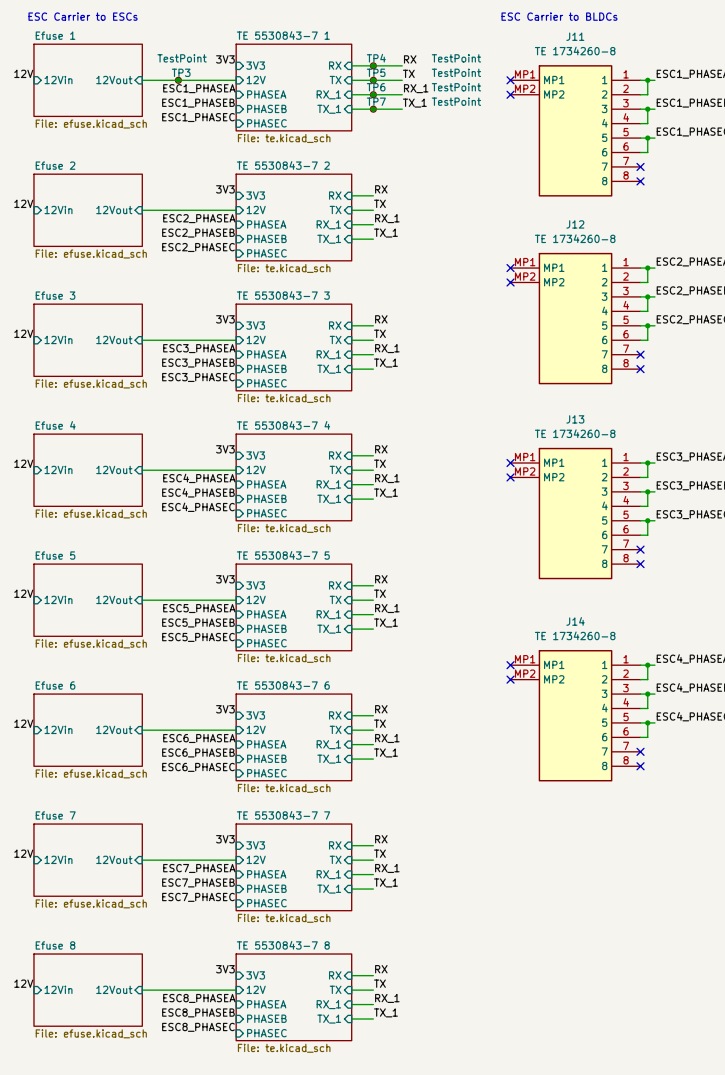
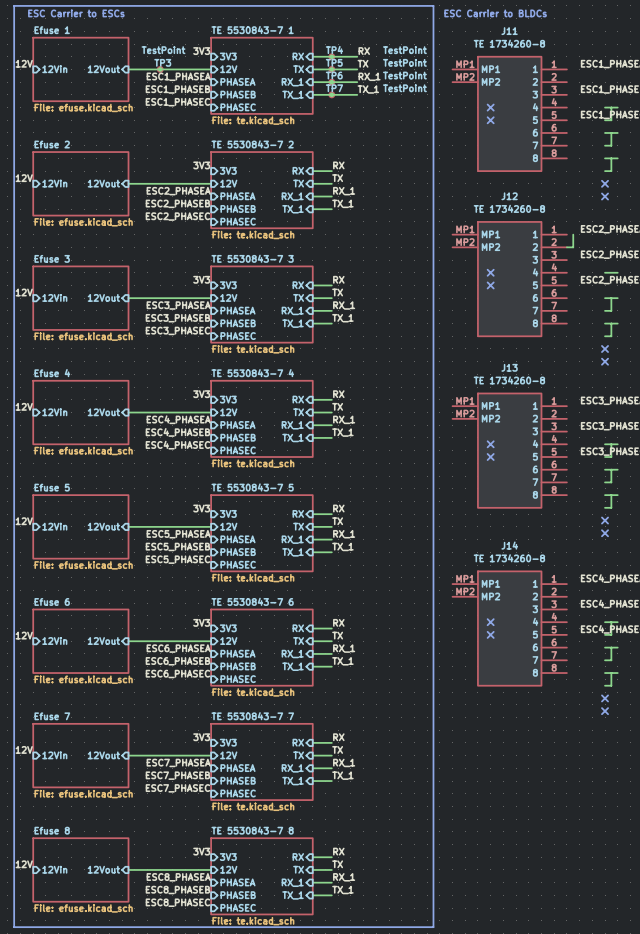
line: none -> (14, 5) (433, 5) (433, 927) (14, 927) (14, 5)
no-connect mark: (510, 80) -> none
wire: (640, 80) (654, 80) -> (605, 107) (617, 107)
wire: (647, 80) (647, 94) (640, 94) -> (611, 107) (611, 120) (605, 120)
junction: (647, 80) -> none
no-connect mark: (510, 94) -> none
wire: (640, 109) (654, 109) -> (605, 132) (617, 132)
wire: (647, 109) (647, 123) (640, 123) -> (611, 132) (611, 145) (605, 145)
junction: (647, 109) -> none
no-connect mark: none -> (490, 107)
no-connect mark: none -> (490, 120)
wire: (640, 138) (654, 138) -> (605, 158) (617, 158)
wire: (647, 138) (647, 152) (640, 152) -> (611, 158) (611, 171) (605, 171)
junction: (647, 138) -> none
no-connect mark: (640, 166) -> none
no-connect mark: (640, 181) -> none
no-connect mark: none -> (605, 183)
no-connect mark: none -> (605, 196)
no-connect mark: (510, 268) -> none
wire: (640, 268) (654, 268) -> (605, 272) (617, 272)
junction: (647, 268) -> none
no-connect mark: (510, 282) -> none
wire: (640, 296) (654, 296) -> (605, 298) (617, 298)
wire: (647, 296) (647, 311) (640, 311) -> (611, 298) (611, 310) (605, 310)
junction: (647, 296) -> none
no-connect mark: none -> (490, 272)
no-connect mark: none -> (490, 285)
wire: (640, 325) (654, 325) -> (605, 323) (617, 323)
wire: (647, 325) (647, 340) (640, 340) -> (611, 323) (611, 336) (605, 336)
junction: (647, 325) -> none
no-connect mark: (640, 354) -> none
no-connect mark: (640, 369) -> none
no-connect mark: none -> (605, 348)
no-connect mark: none -> (605, 361)
no-connect mark: (510, 463) -> none
wire: (640, 463) (654, 463) -> (605, 444) (617, 444)
wire: (647, 463) (647, 477) (640, 477) -> (611, 444) (611, 457) (605, 457)
junction: (647, 463) -> none
no-connect mark: (510, 477) -> none
wire: (640, 491) (654, 491) -> (605, 469) (617, 469)
wire: (647, 491) (647, 506) (640, 506) -> (611, 469) (611, 482) (605, 482)
junction: (647, 491) -> none
no-connect mark: none -> (490, 444)
no-connect mark: none -> (490, 457)
wire: (640, 520) (654, 520) -> (605, 495) (617, 495)
wire: (647, 520) (647, 535) (640, 535) -> (611, 495) (611, 507) (605, 507)
junction: (647, 520) -> none
no-connect mark: (640, 549) -> none
no-connect mark: (640, 564) -> none
no-connect mark: none -> (605, 520)
no-connect mark: none -> (605, 533)
no-connect mark: (510, 665) -> none
wire: (640, 665) (654, 665) -> (605, 622) (617, 622)
wire: (647, 665) (647, 679) (640, 679) -> (611, 622) (611, 634) (605, 634)
junction: (647, 665) -> none
no-connect mark: (510, 679) -> none
wire: (640, 694) (654, 694) -> (605, 647) (617, 647)
wire: (647, 694) (647, 708) (640, 708) -> (611, 647) (611, 660) (605, 660)
junction: (647, 694) -> none
no-connect mark: none -> (490, 622)
no-connect mark: none -> (490, 634)
wire: (640, 722) (654, 722) -> (605, 673) (617, 673)
wire: (647, 722) (647, 737) (640, 737) -> (611, 673) (611, 685) (605, 685)
junction: (647, 722) -> none
no-connect mark: (640, 751) -> none
no-connect mark: (640, 766) -> none
no-connect mark: none -> (605, 698)
no-connect mark: none -> (605, 711)

